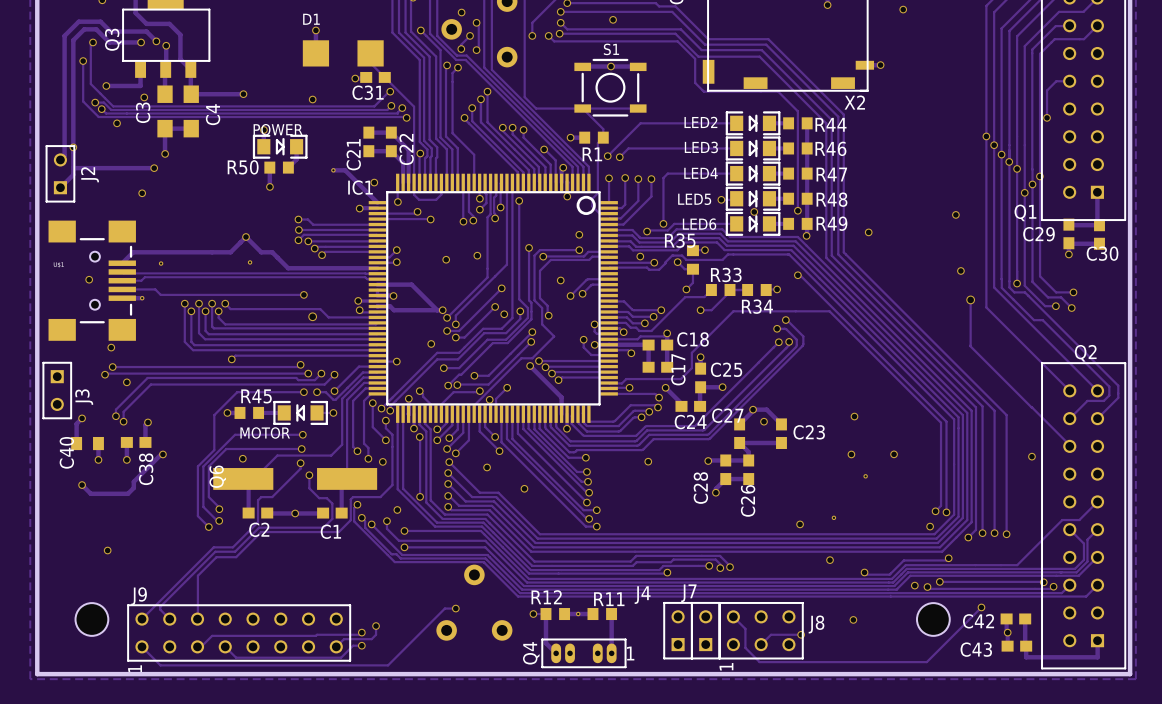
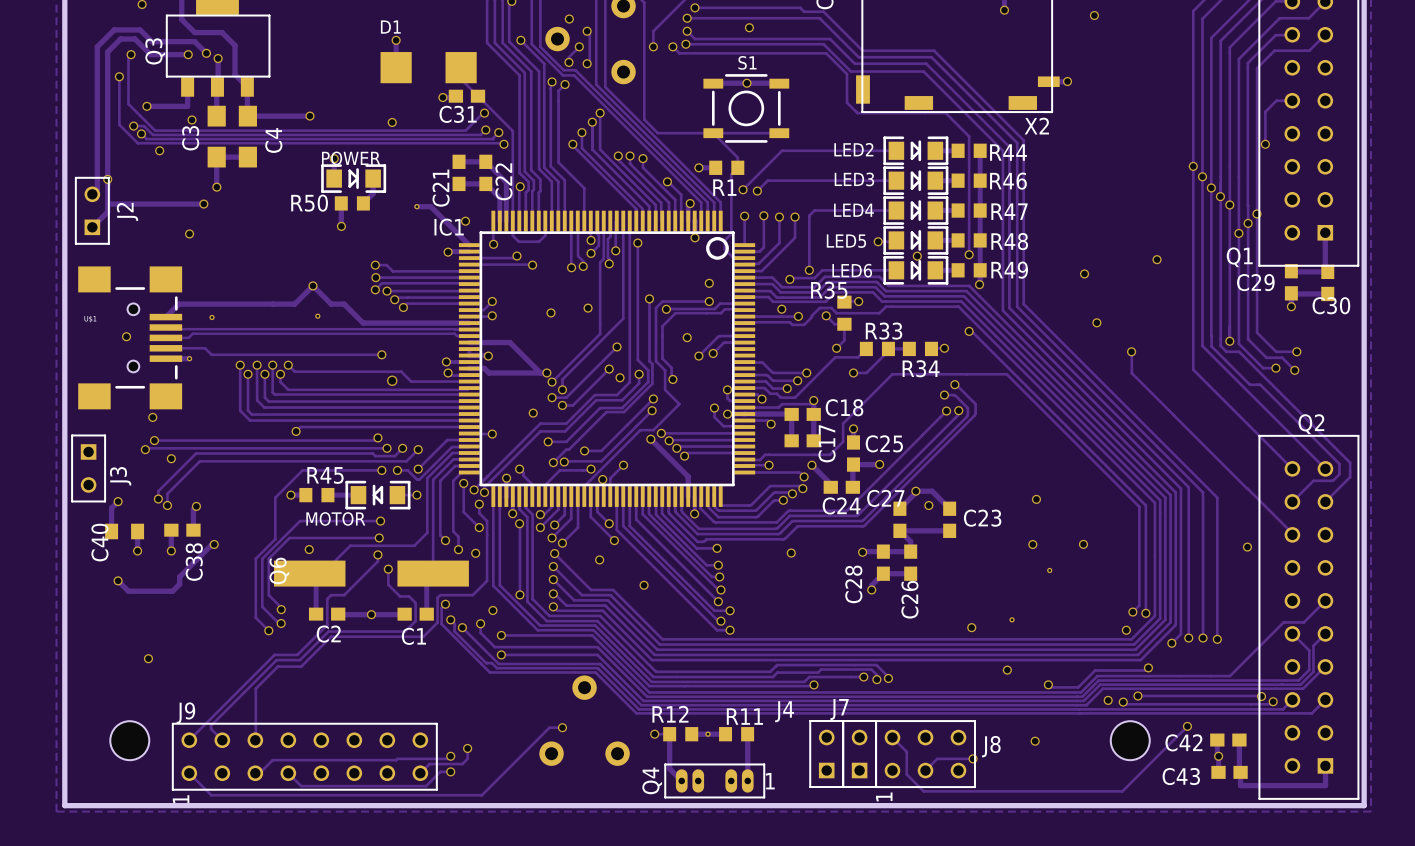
via: none -> (1084, 273)
via: (868, 232) -> none
via: none -> (1096, 322)
via: (960, 270) -> none
via: none -> (1131, 351)
track: (970, 299) (970, 345) -> (1131, 351) (1131, 373) (1173, 415)
via: (970, 299) -> none

